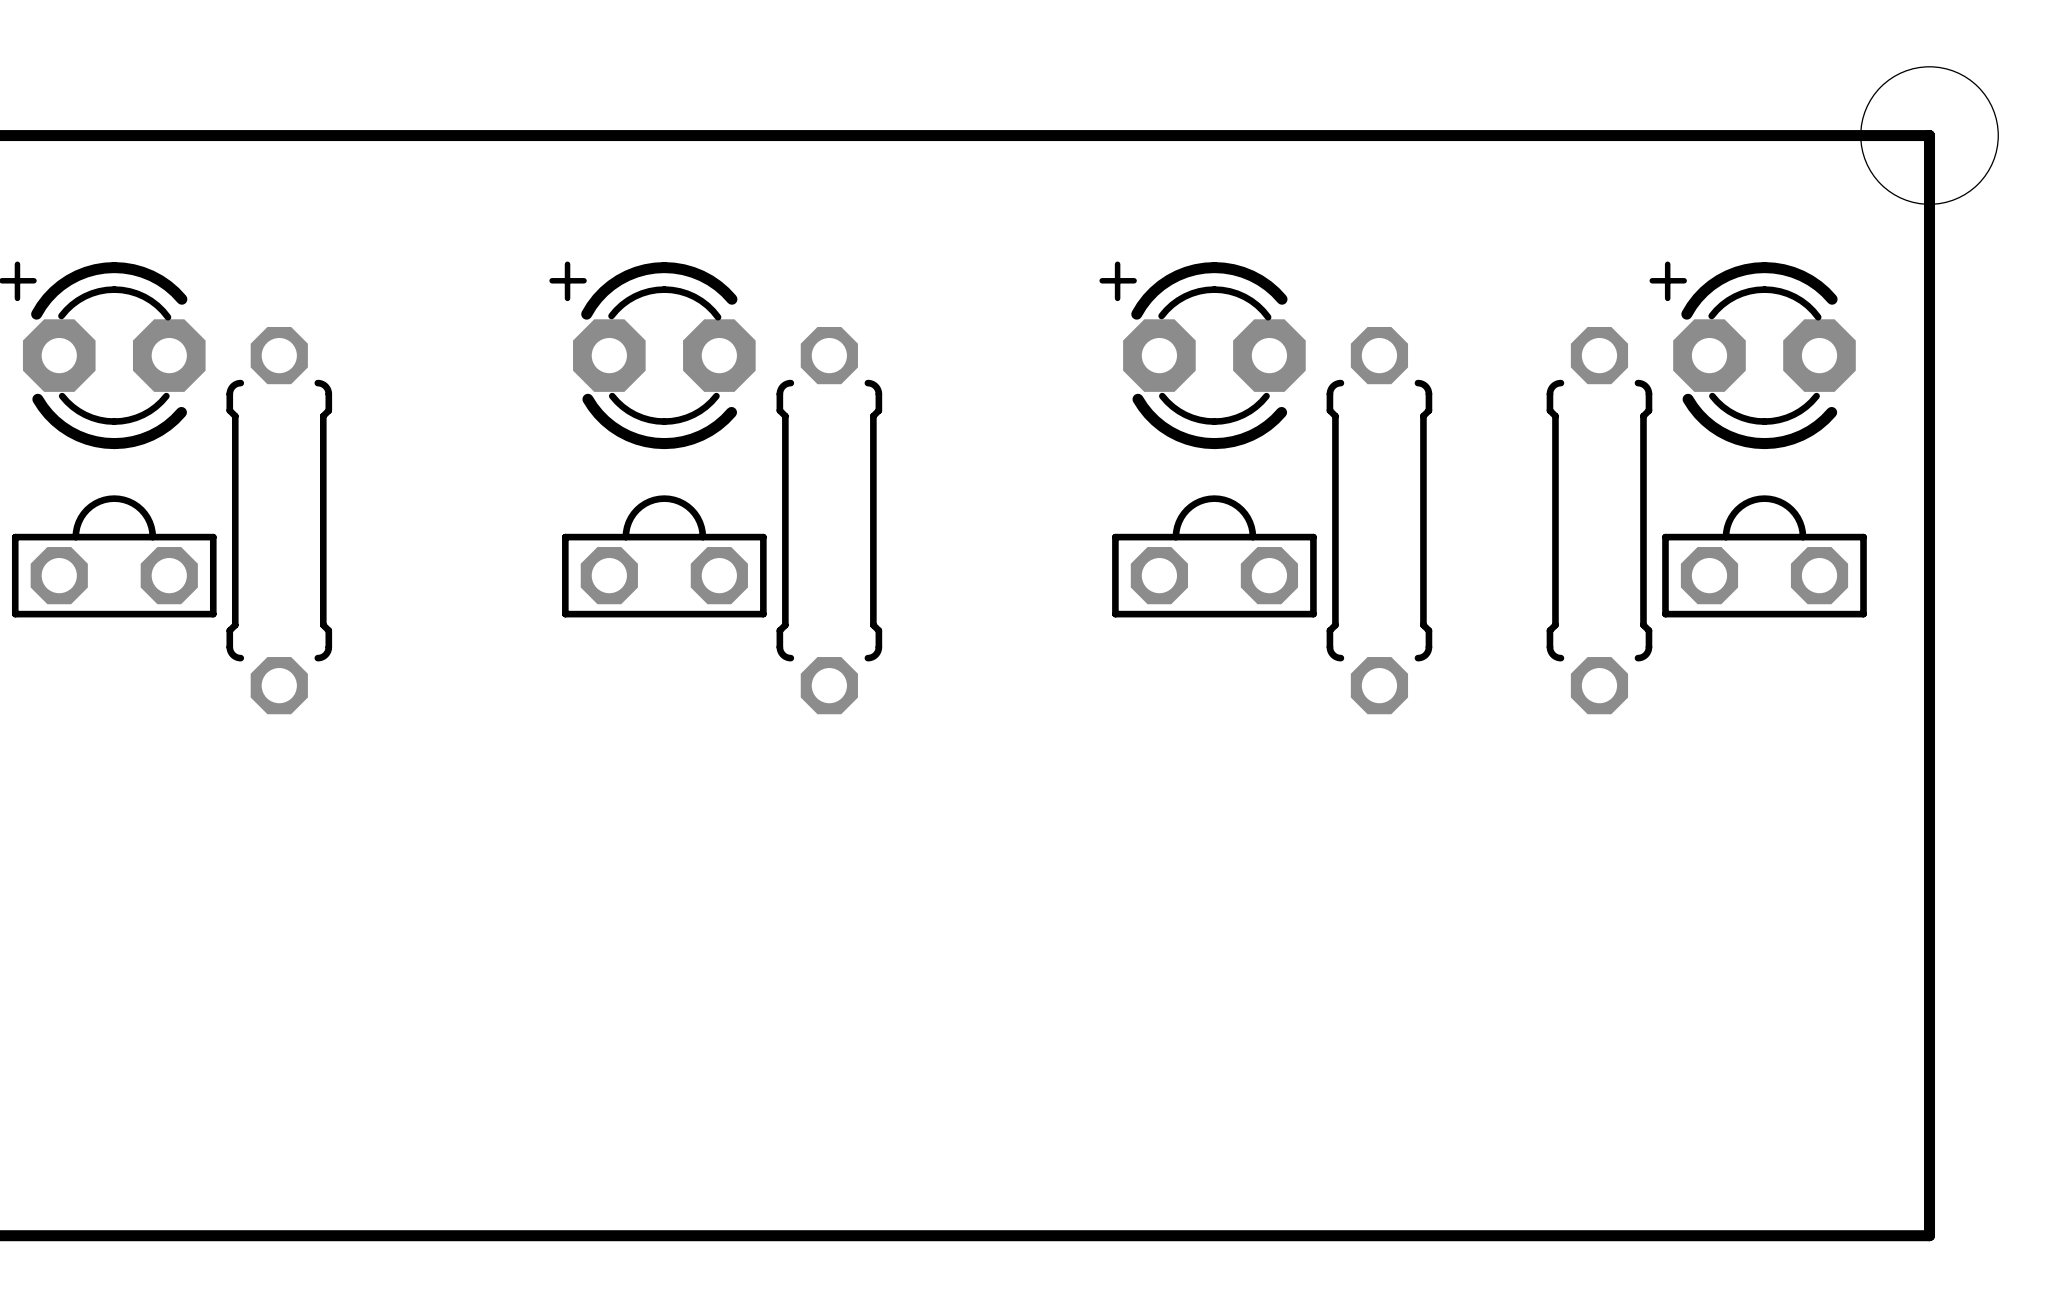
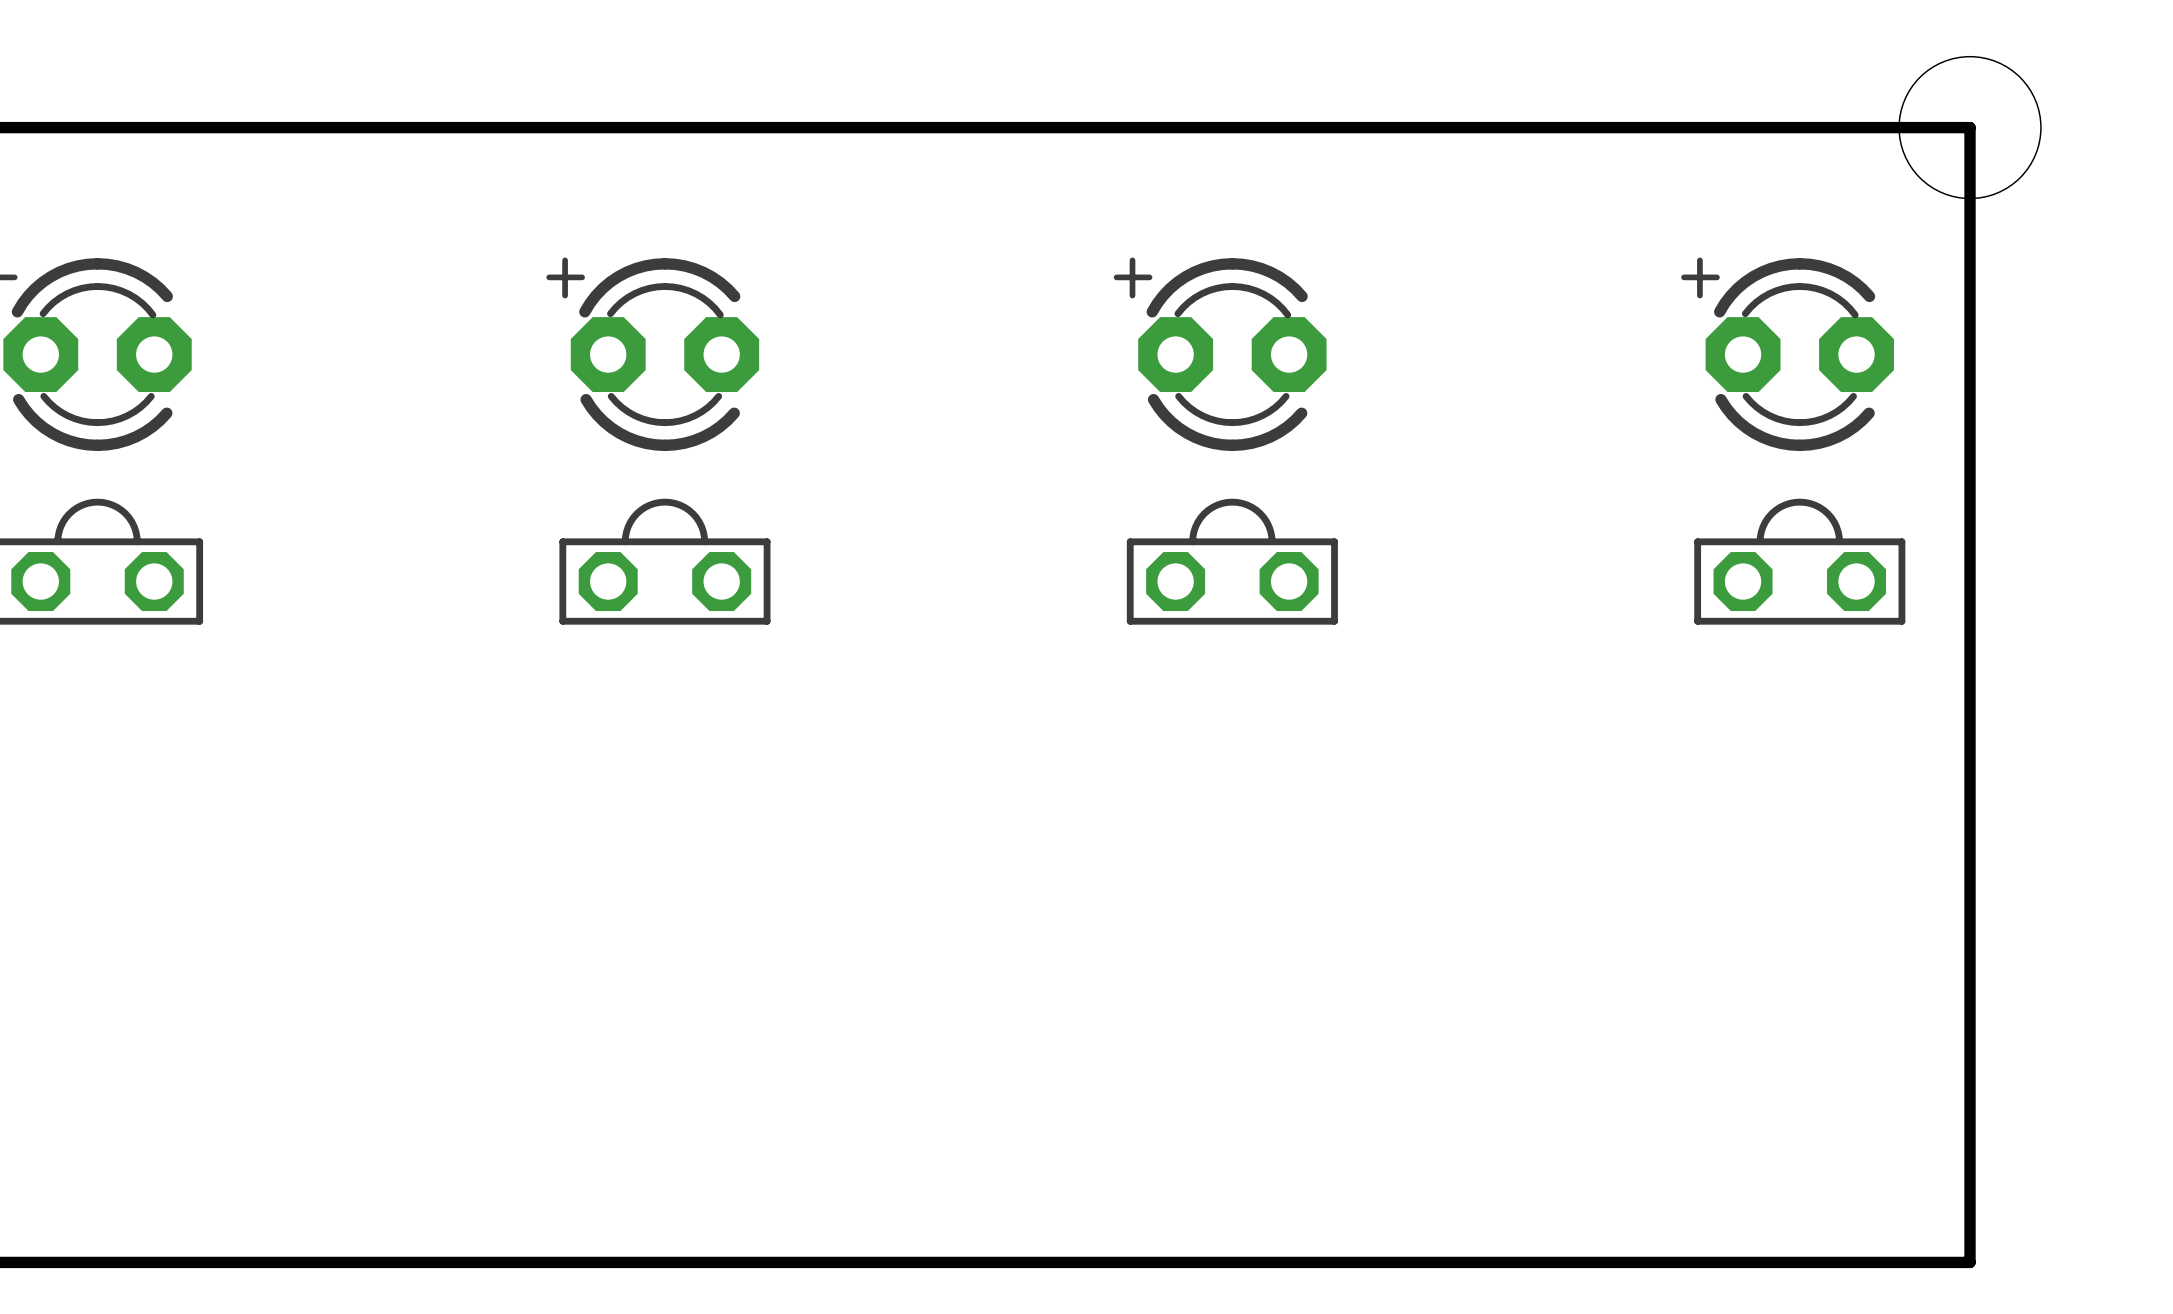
part: (279, 520) -> none
part: (829, 520) -> none
part: (1379, 520) -> none
part: (1599, 520) -> none

